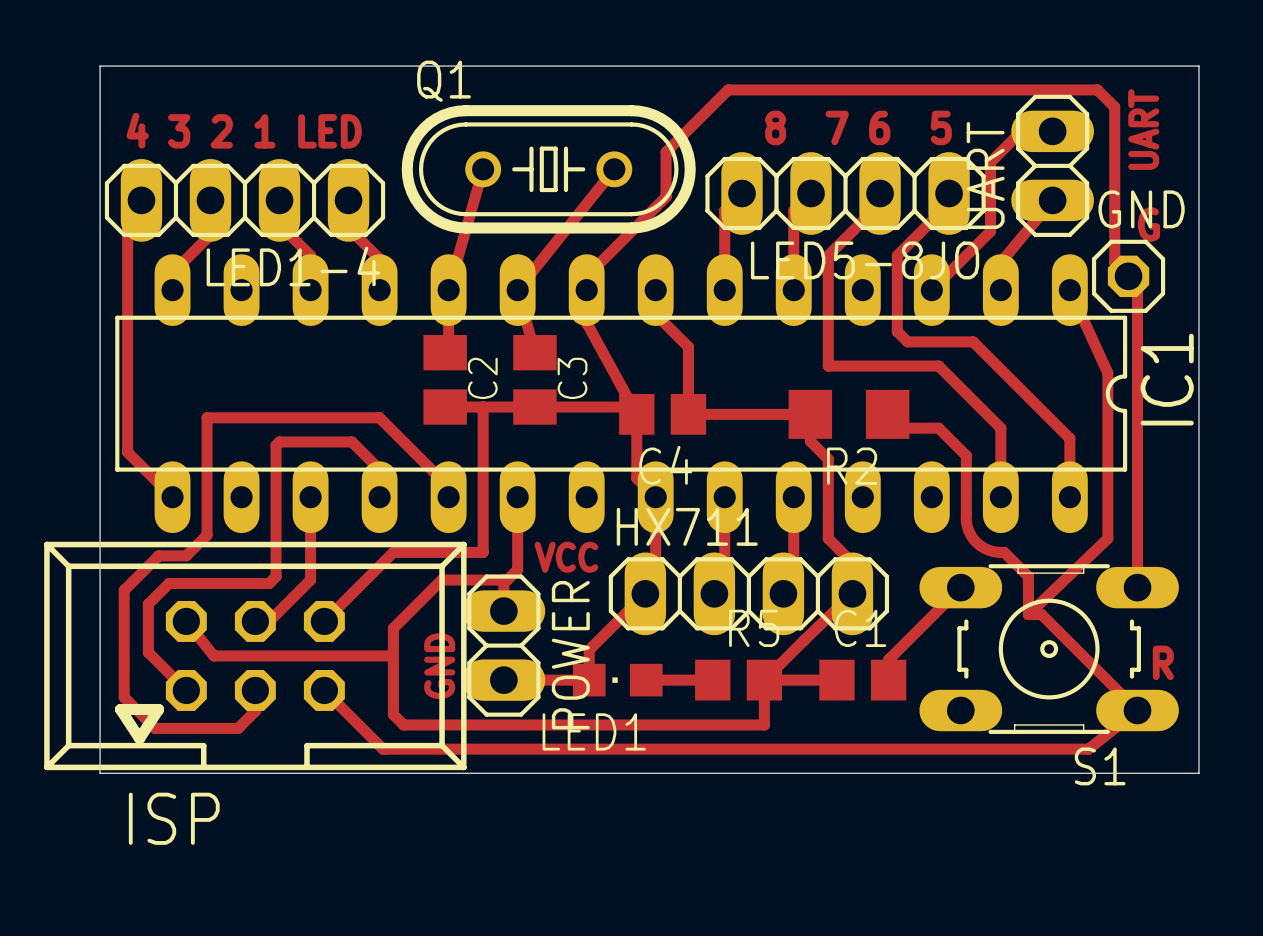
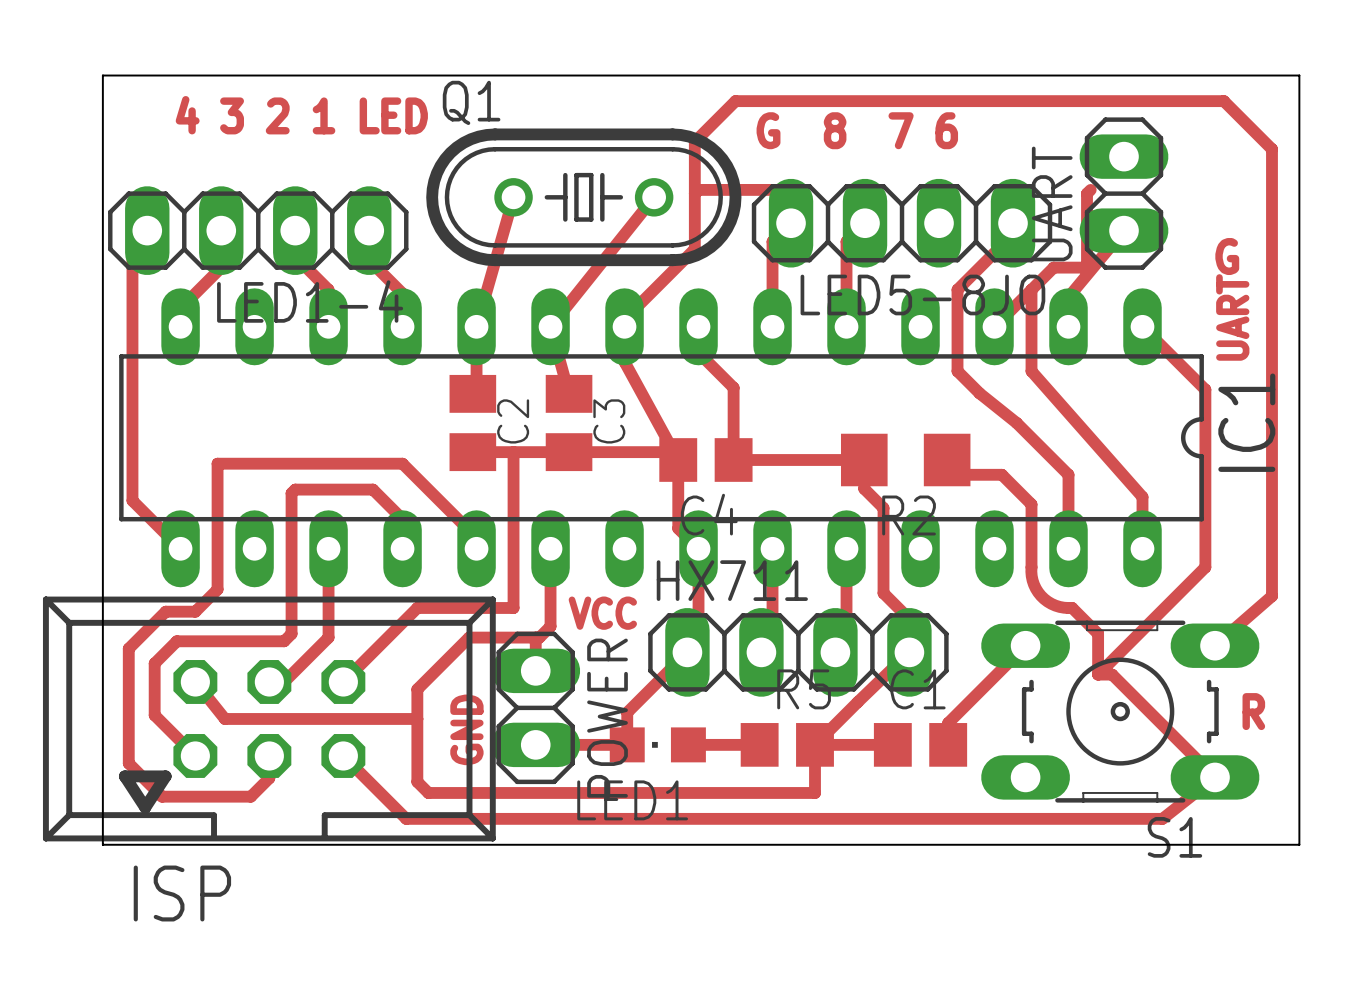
board edge: (100, 66) (1198, 66) (1198, 773) -> (102, 86) (102, 75) (1299, 75) (1299, 844) (1280, 844)
text: 8 7 6 5 (858, 127) -> G 8 7 6 (857, 130)
text position: UART (1143, 129) -> UART (1232, 317)
text position: 4 3 2 1 LED (244, 130) -> 4 3 2 1 LED (301, 115)
top track: (1052, 131) (1021, 131) (990, 162) (990, 231) (987, 234) -> (1090, 189) (1087, 193) (1087, 267) (1053, 267)
top track: none -> (794, 189) (698, 189) (694, 193)
top track: (880, 193) (880, 203) (828, 255) (828, 366) (938, 366) (952, 379) -> (968, 382) (1016, 423)
GND: (1128, 276) -> none
top track: (586, 283) (586, 276) (666, 196) (666, 152) (728, 89) (1097, 89) (1114, 107) (1114, 262) (1137, 285) (1137, 587) -> (624, 319) (694, 249) (694, 141) (735, 101) (1223, 101) (1271, 149) (1271, 596) (1215, 645)
top track: (1069, 290) (1107, 372) (1107, 538) (1028, 614) -> (1142, 326) (1205, 389) (1205, 567) (1098, 674)
top track: (907, 341) (973, 341) (1069, 438) (1069, 448) -> (1031, 289) (1031, 371) (1142, 496)
text position: R (1163, 662) -> R (1253, 711)

